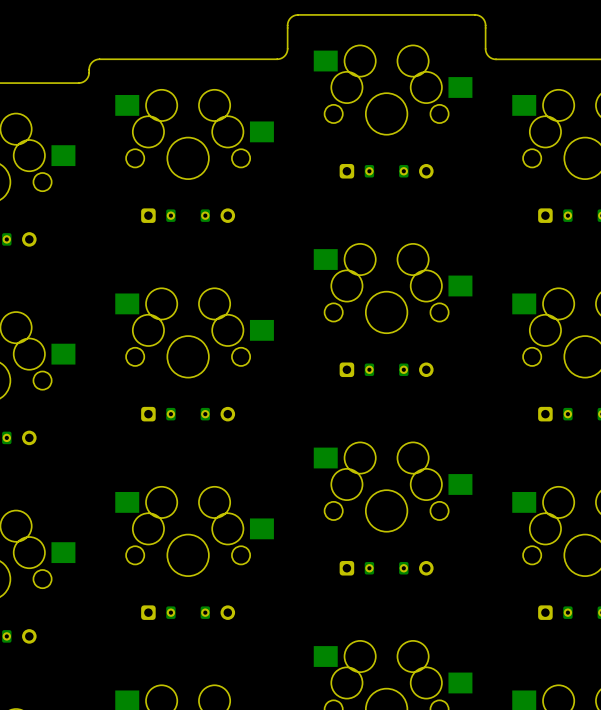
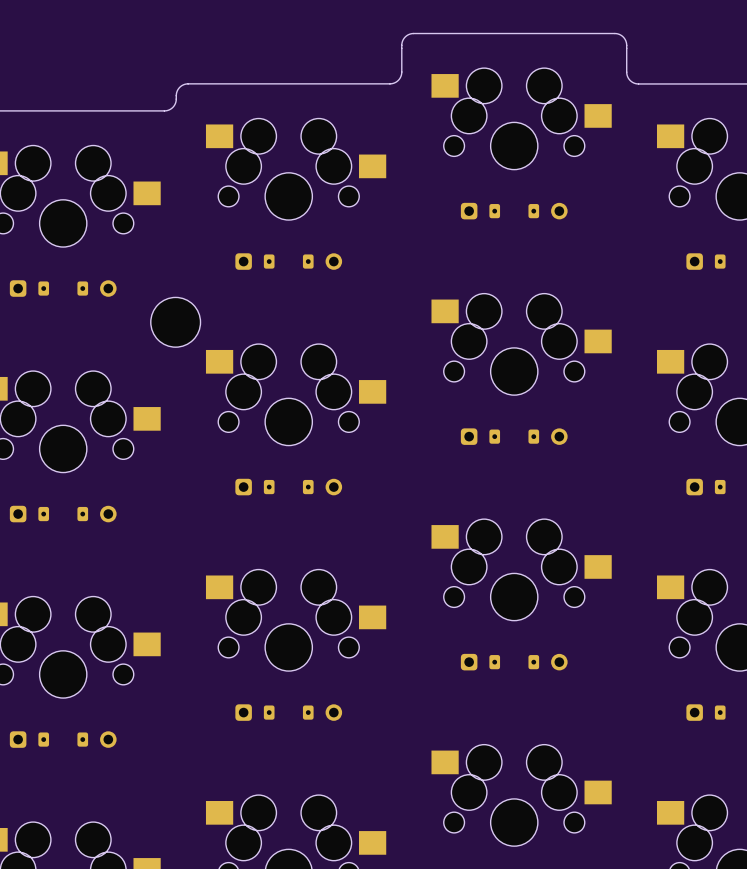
part: none -> (175, 322)

